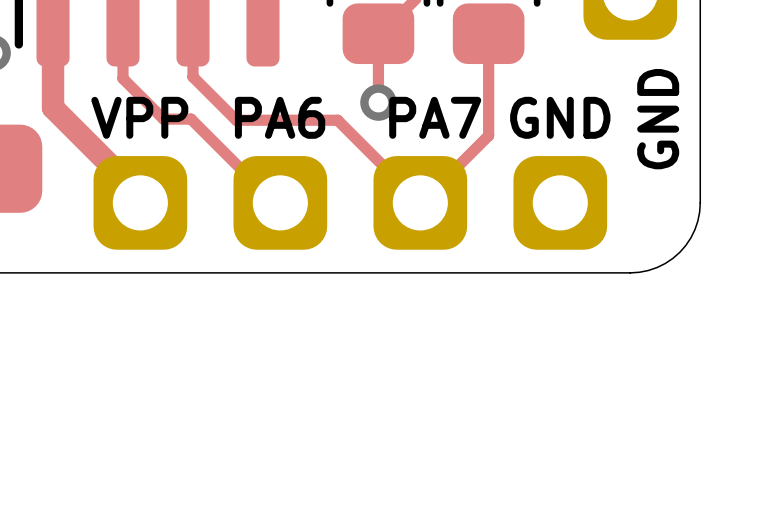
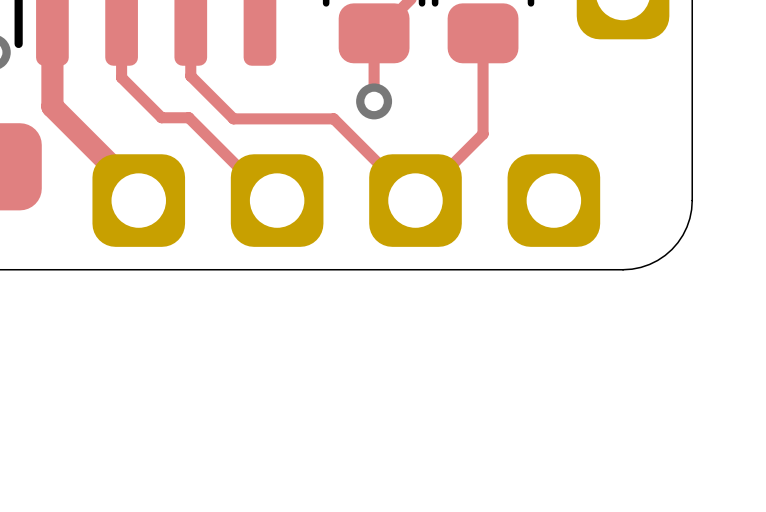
text: VPP (139, 117) -> none
text: PA6 (280, 117) -> none
text: PA7 (435, 117) -> none
text: GND (560, 117) -> none
text: GND (658, 119) -> none

